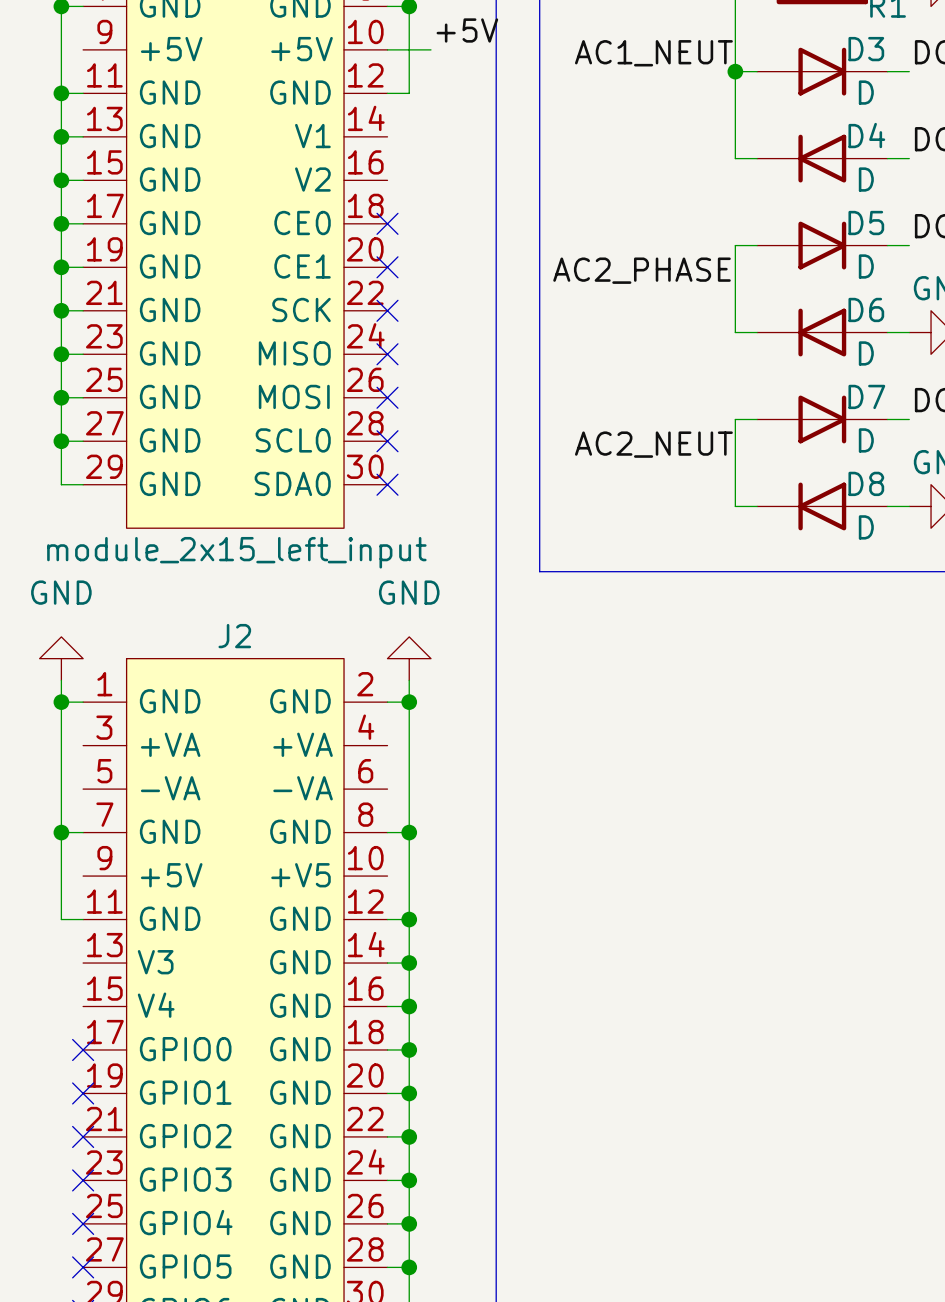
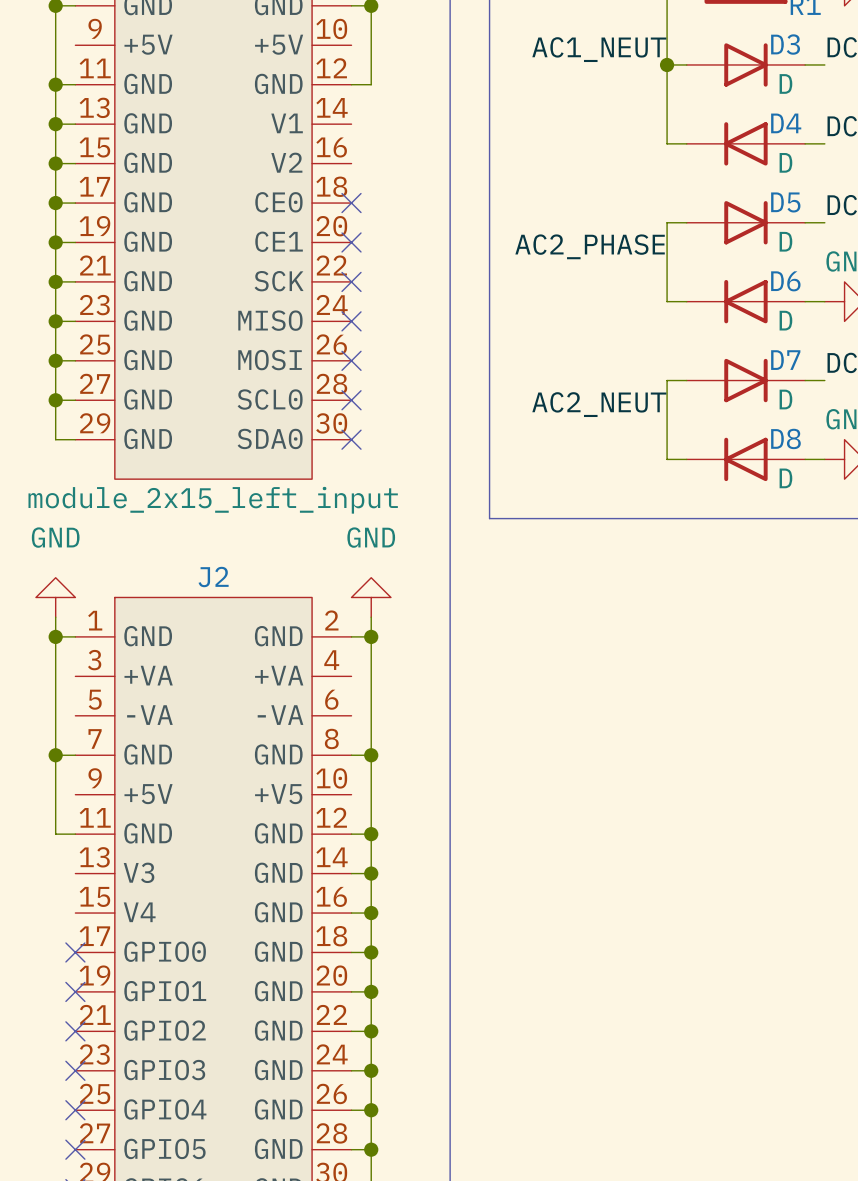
label: +5V (467, 30) -> none
wire: (387, 49) (430, 49) -> none

